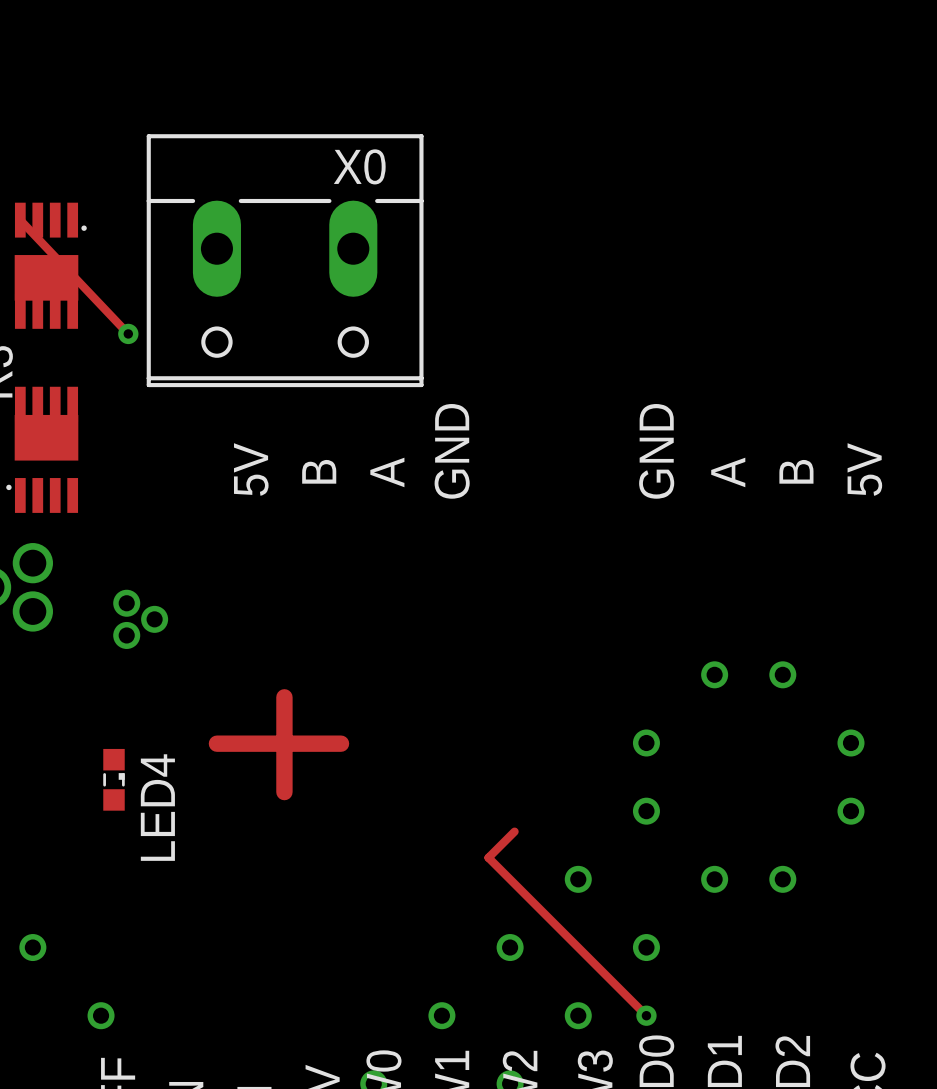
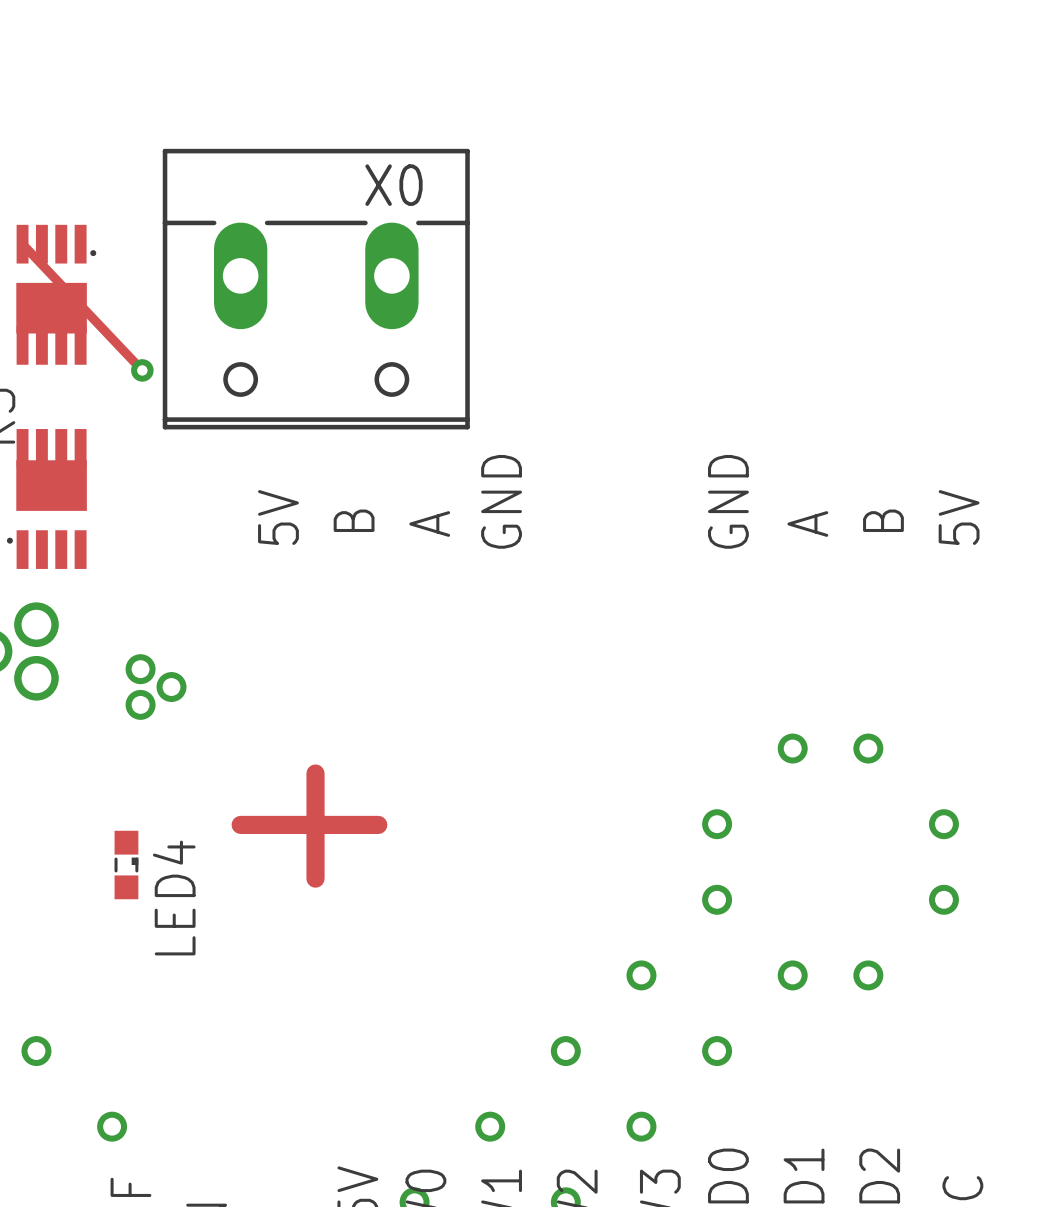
track: (514, 831) (488, 857) (646, 1015) -> none
via: (646, 1015) -> none

